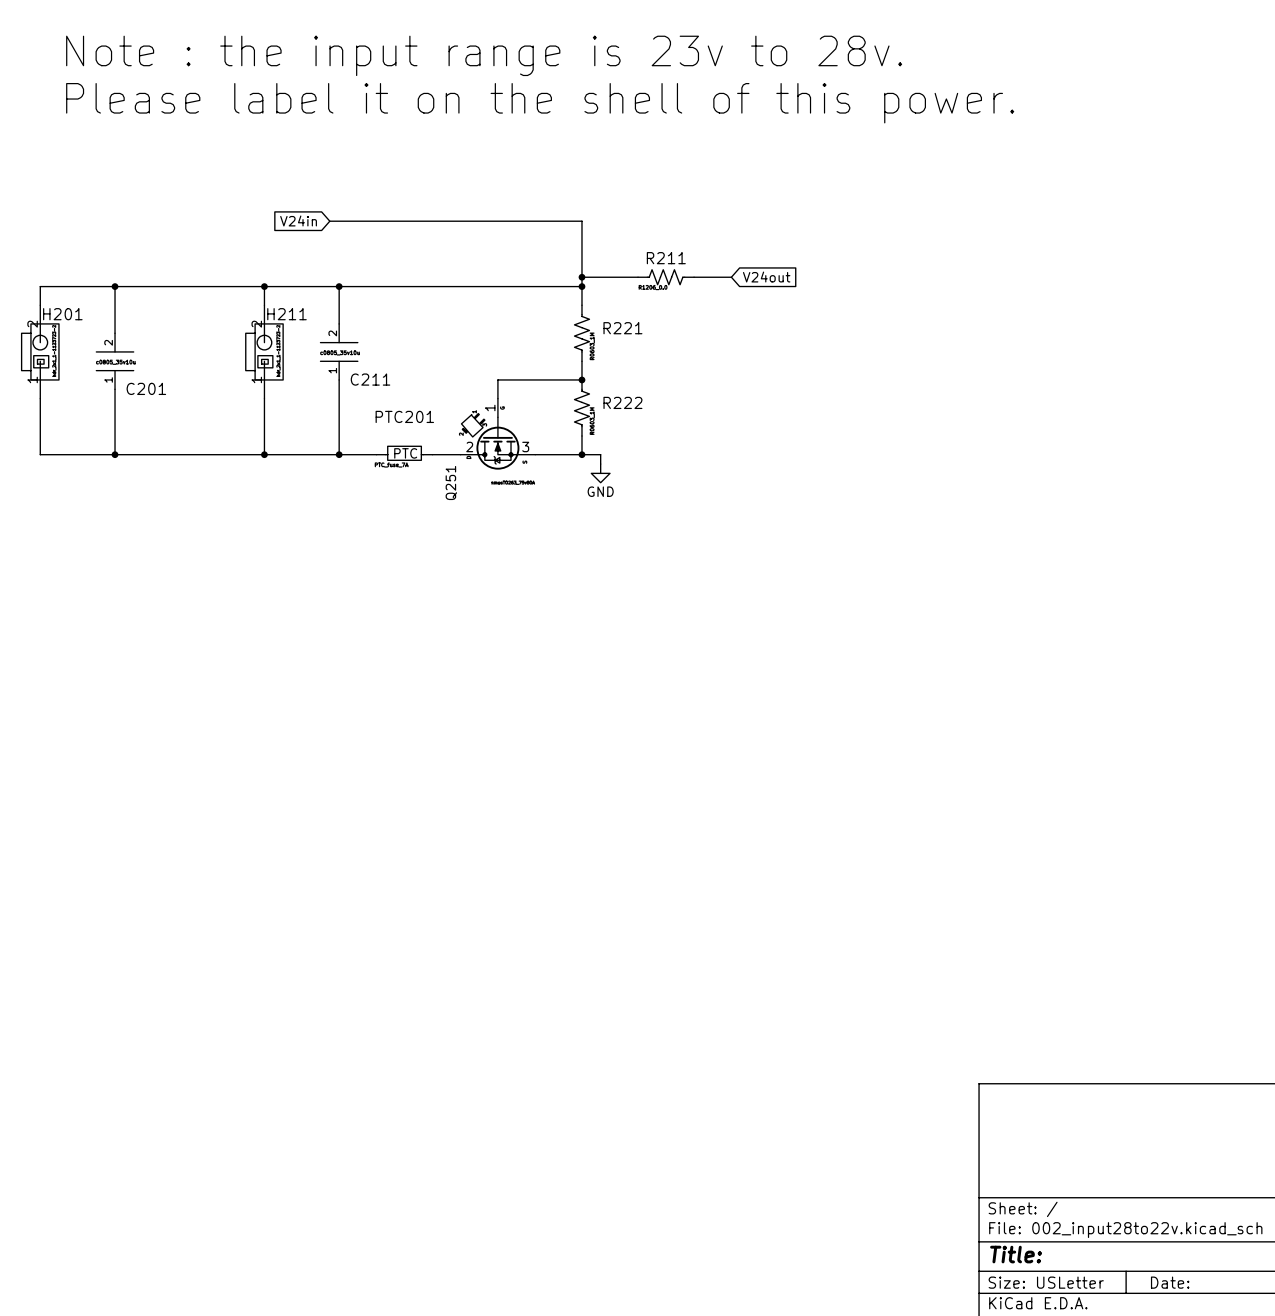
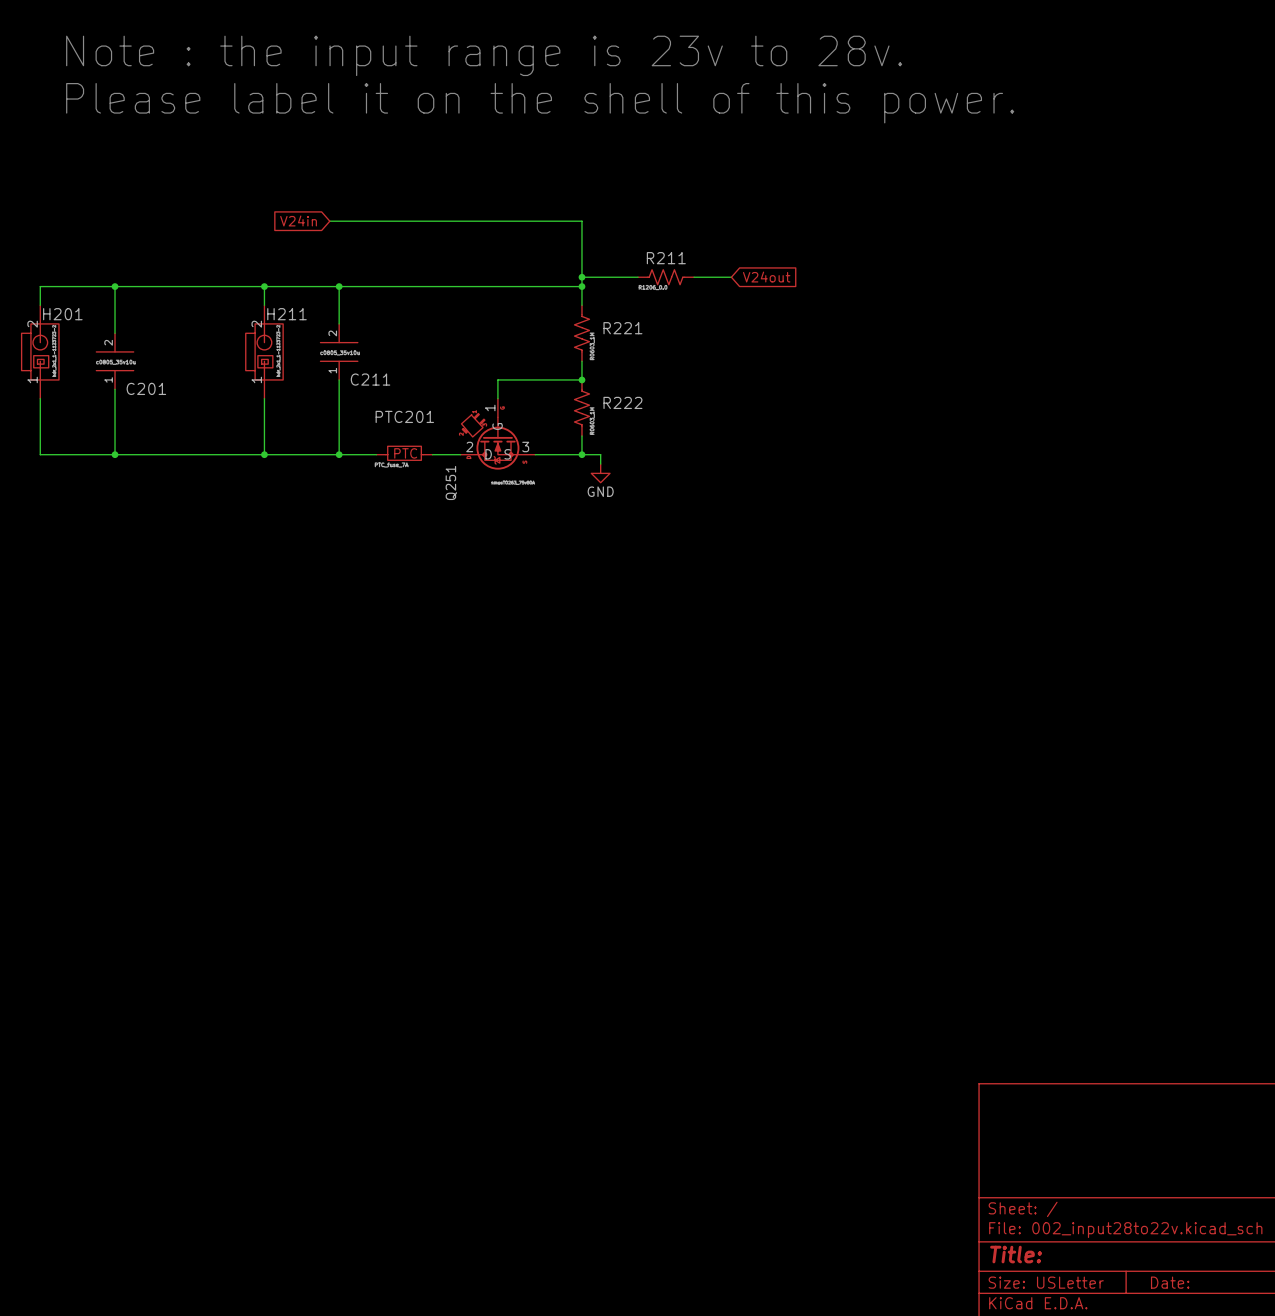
Q251 pin name: none -> G (497, 426)
Q251 pin name: none -> D (488, 454)
Q251 pin name: none -> S (507, 454)

